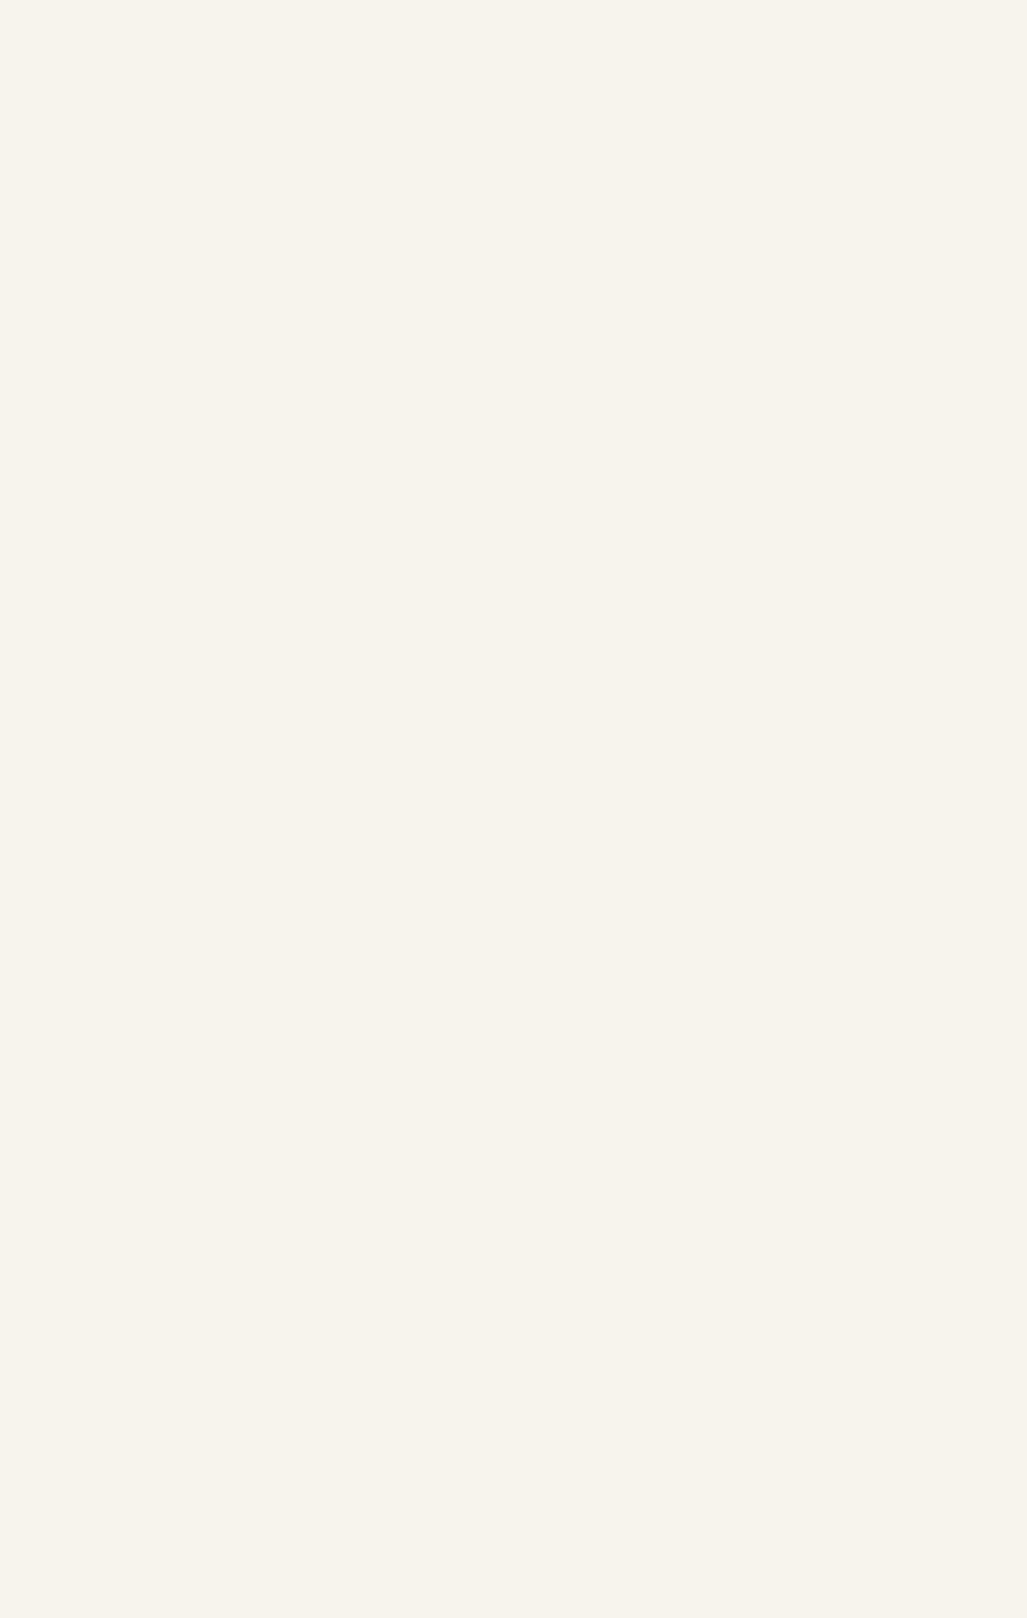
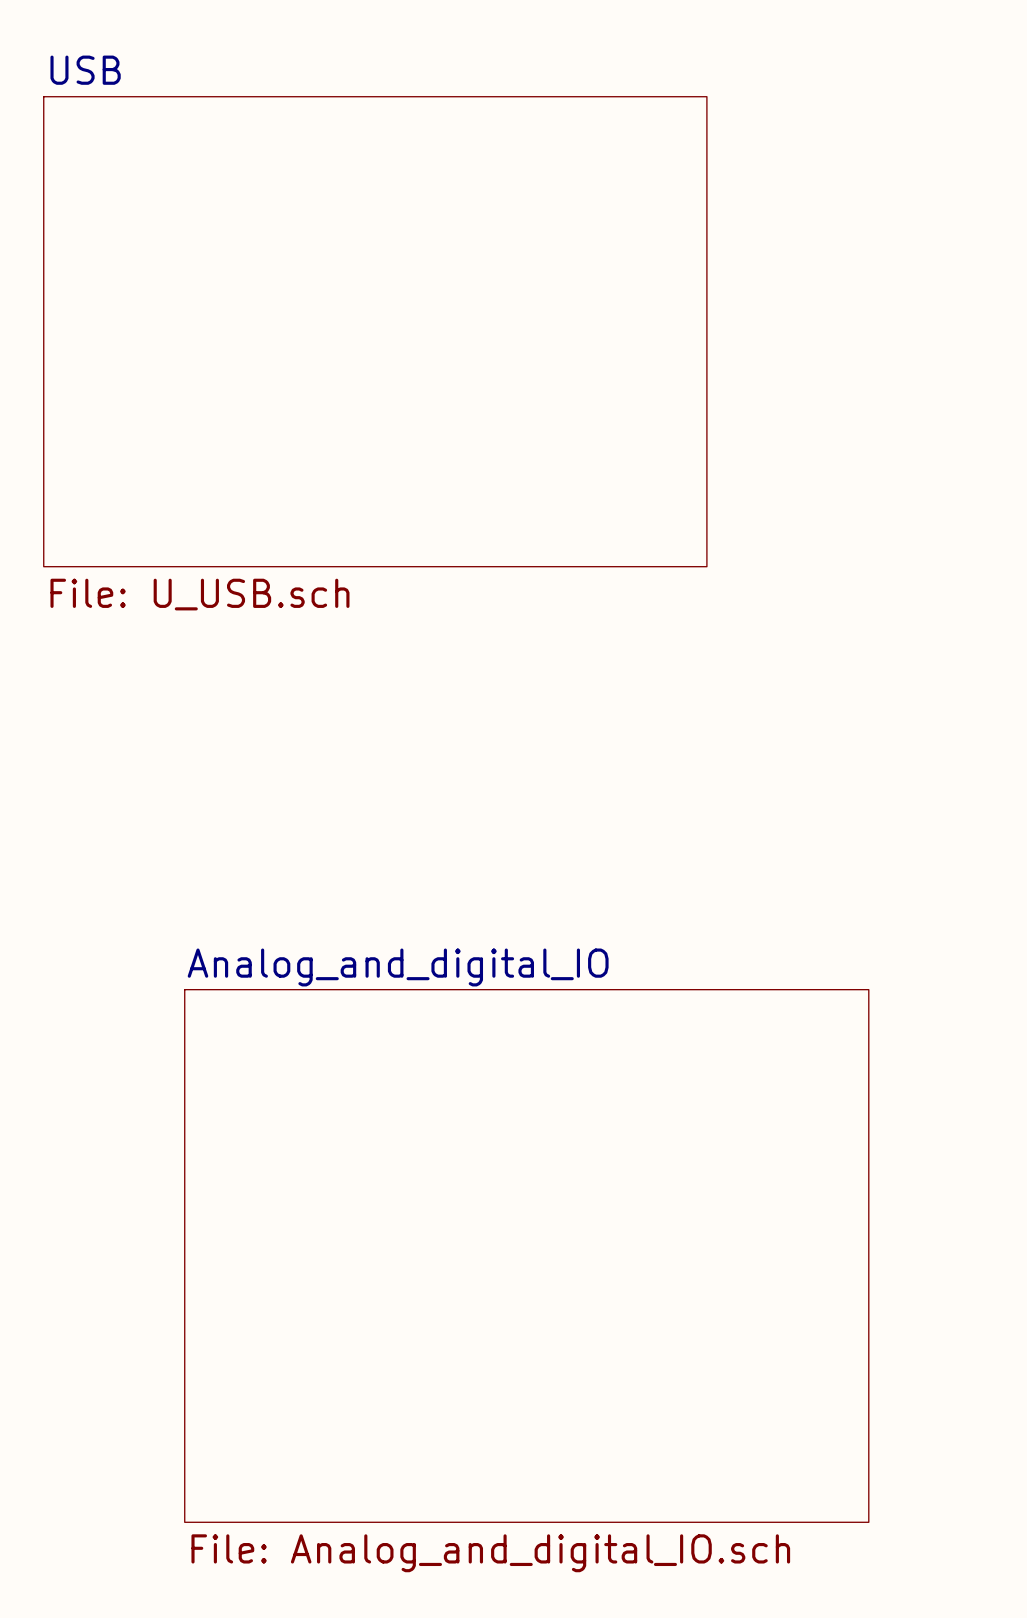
sheet USB: none -> File: U_USB.sch (375, 331)
sheet Analog_and_digital_IO: none -> File: Analog_and_digital_IO.sch (526, 1255)

